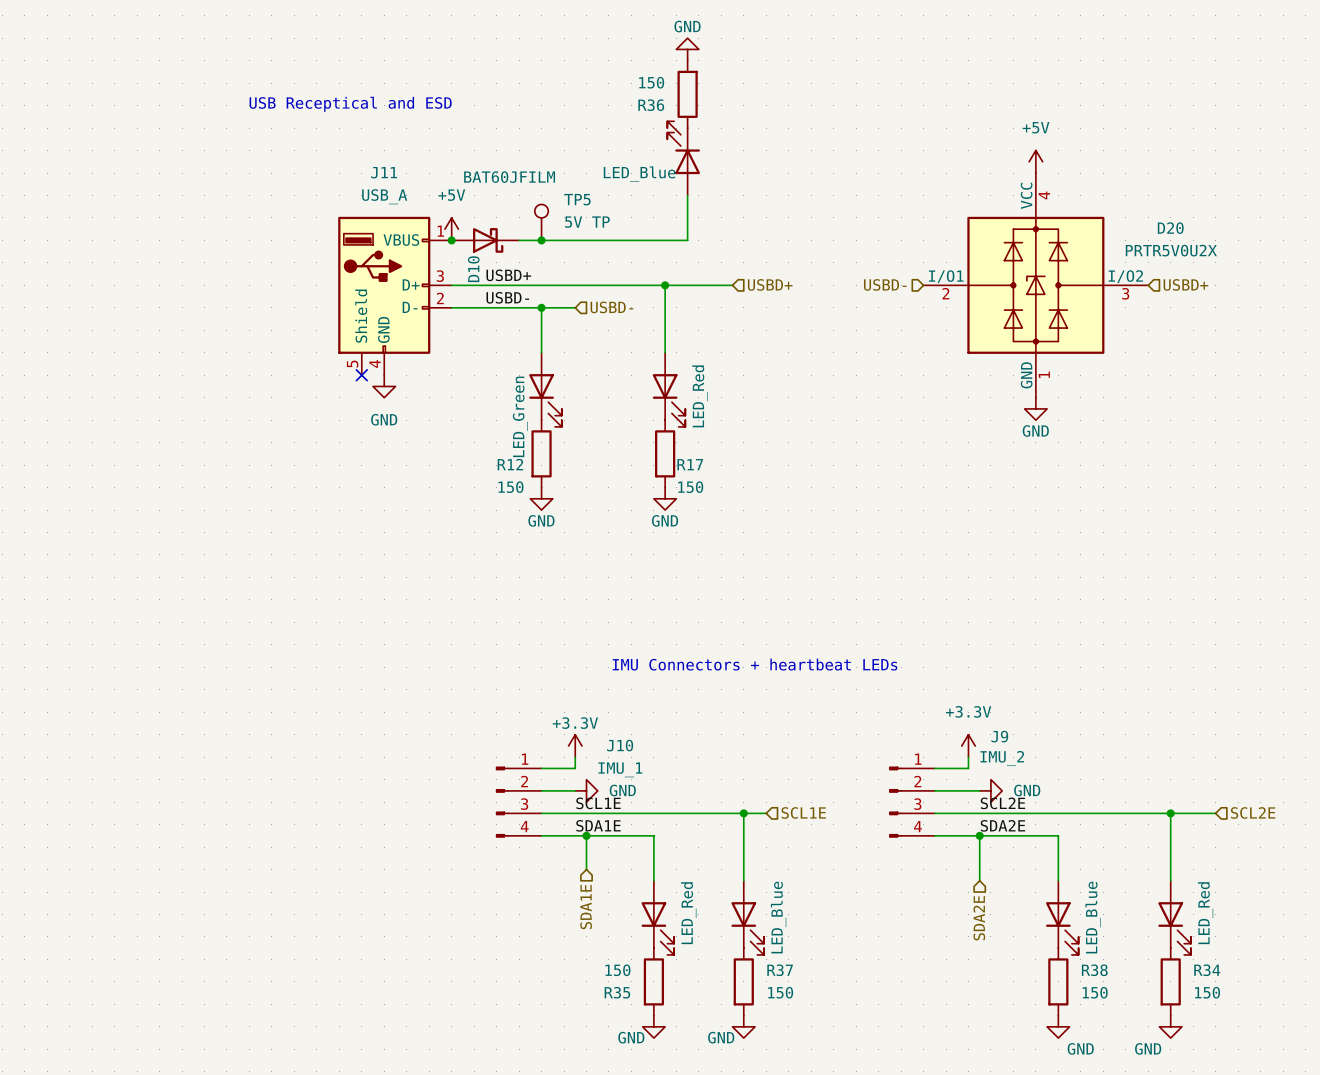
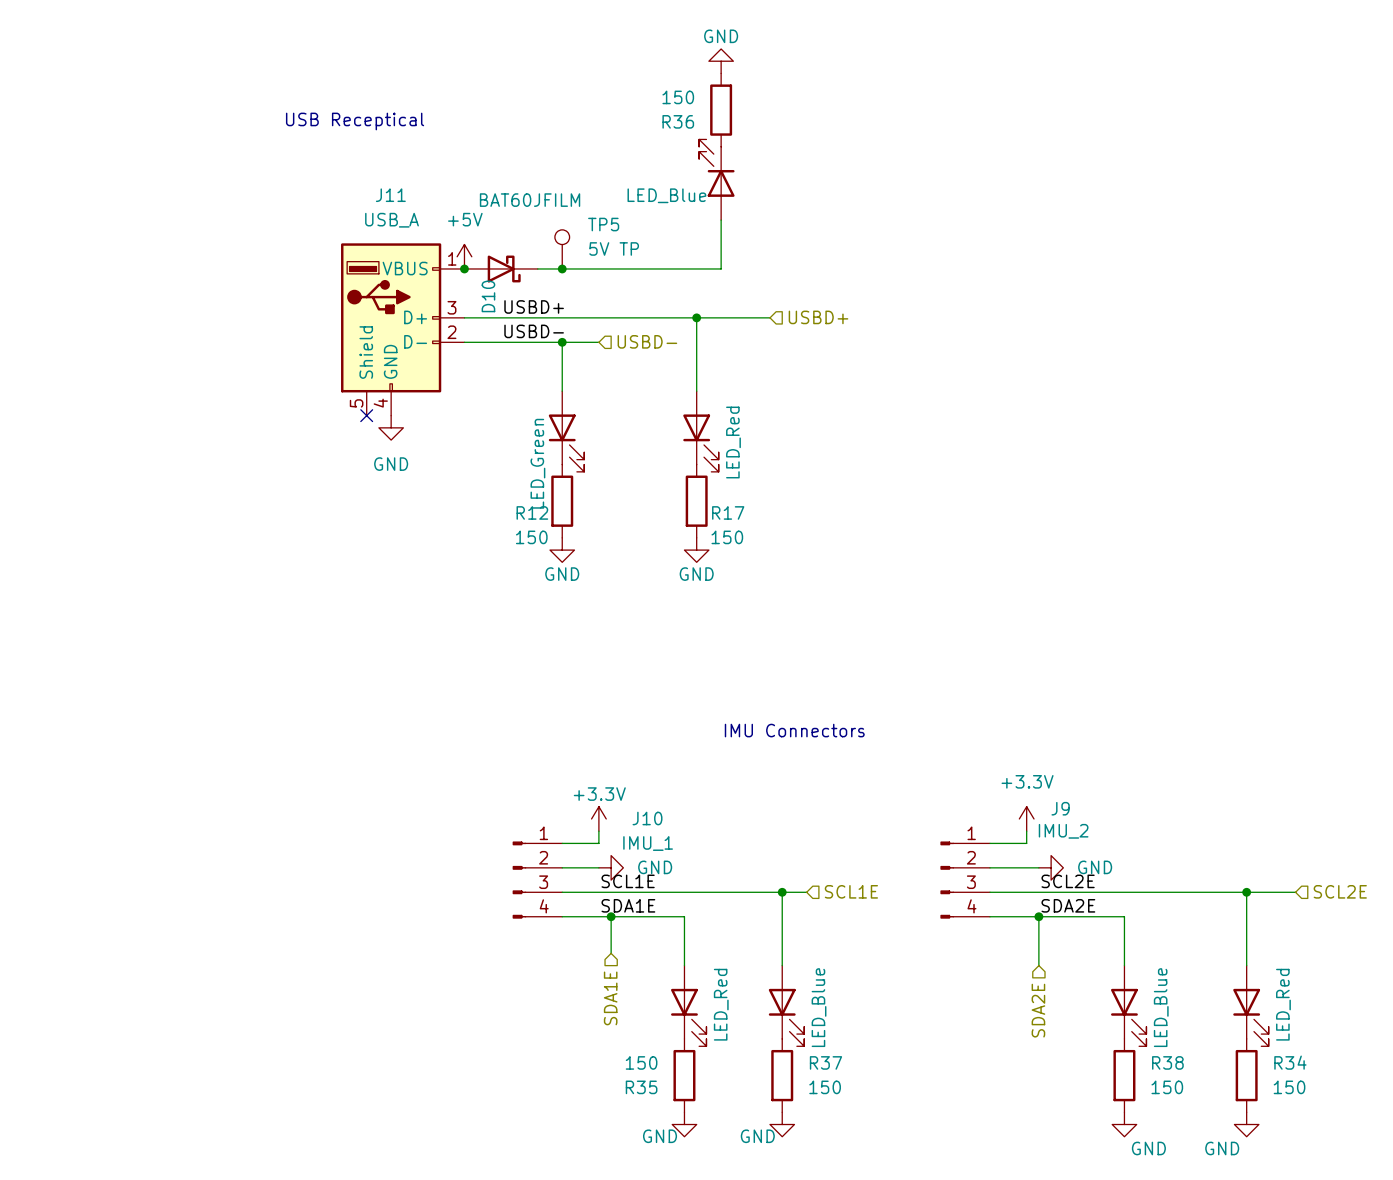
text: USB Receptical and ESD (350, 104) -> USB Receptical (355, 121)
power symbol: +5V (1035, 161) -> none
hierarchical label: USBD- (885, 284) -> none
hierarchical label: USBD+ (1185, 284) -> none
D20: PRTR5V0U2X (1035, 285) -> none
power symbol: GND (1035, 408) -> none
text: IMU Connectors + heartbeat LEDs (755, 664) -> IMU Connectors (794, 730)

